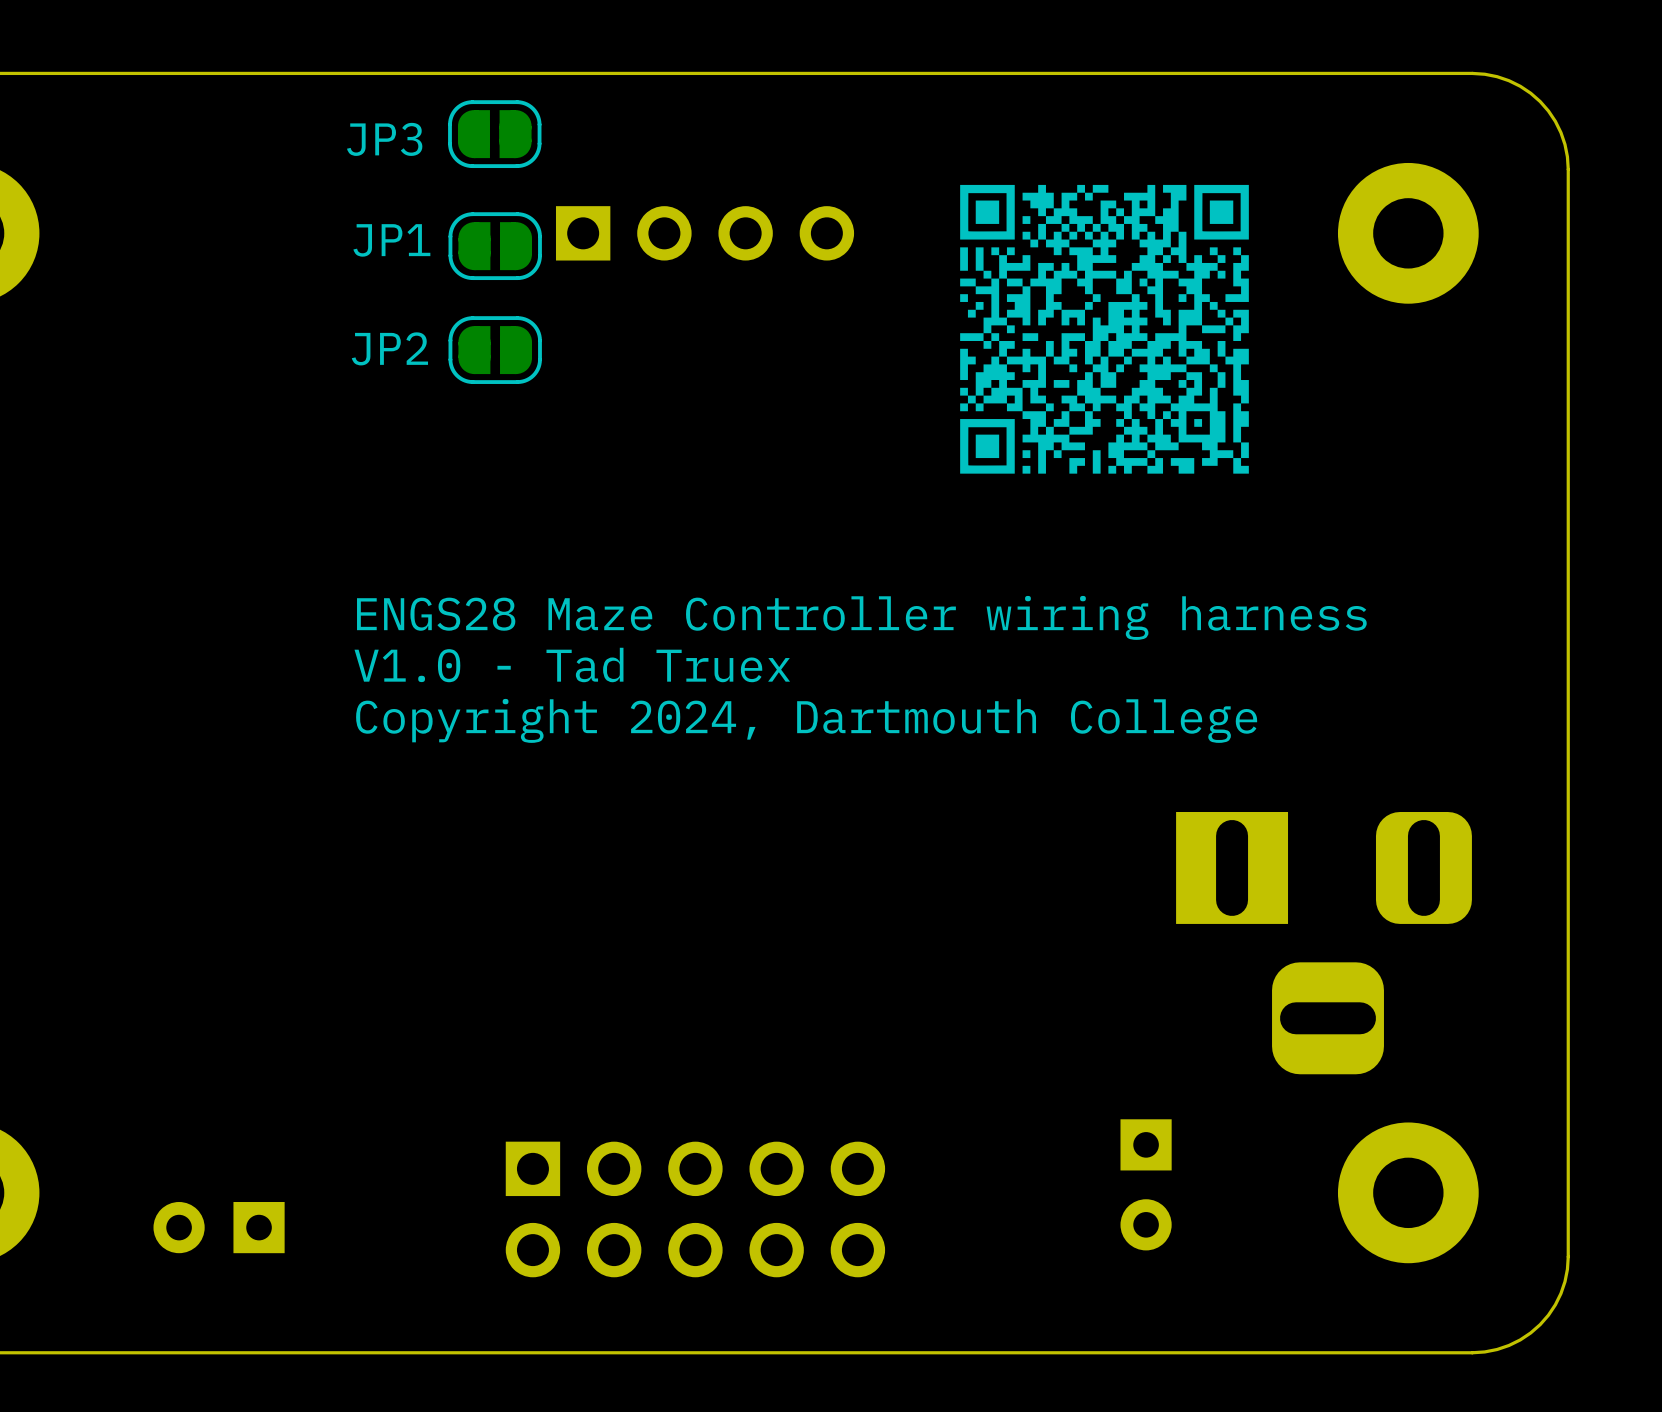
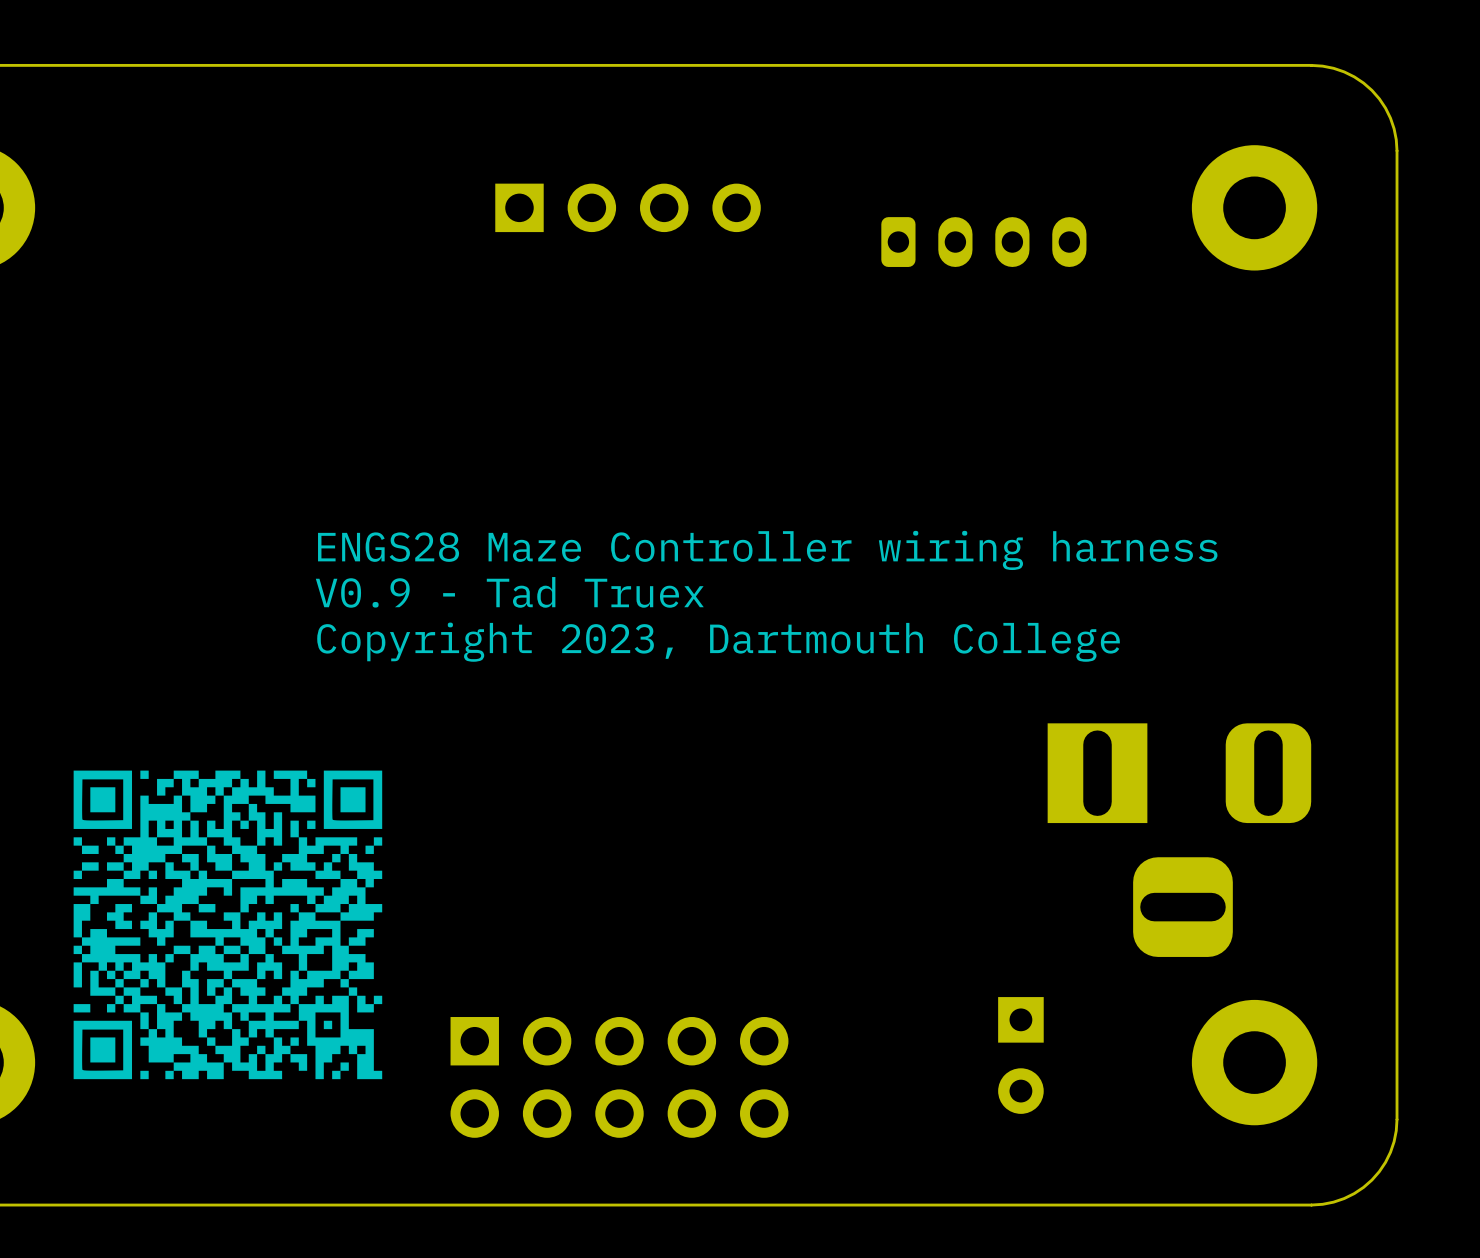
JP3: (494, 134) -> none
drawing: [960, 184, 1249, 474] -> none
JP1: (495, 246) -> none
part: none -> (983, 242)
JP2: (495, 350) -> none
text: V1.0 - Tad Truex (572, 664) -> V0.9 - Tad Truex (509, 592)
text: Copyright 2024, Dartmouth College (806, 720) -> Copyright 2023, Dartmouth College (718, 642)
drawing: none -> [73, 770, 383, 1080]
part: (219, 1227) -> none

